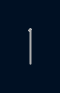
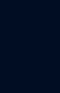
line: (29, 30) (30, 29) (30, 63) -> none

